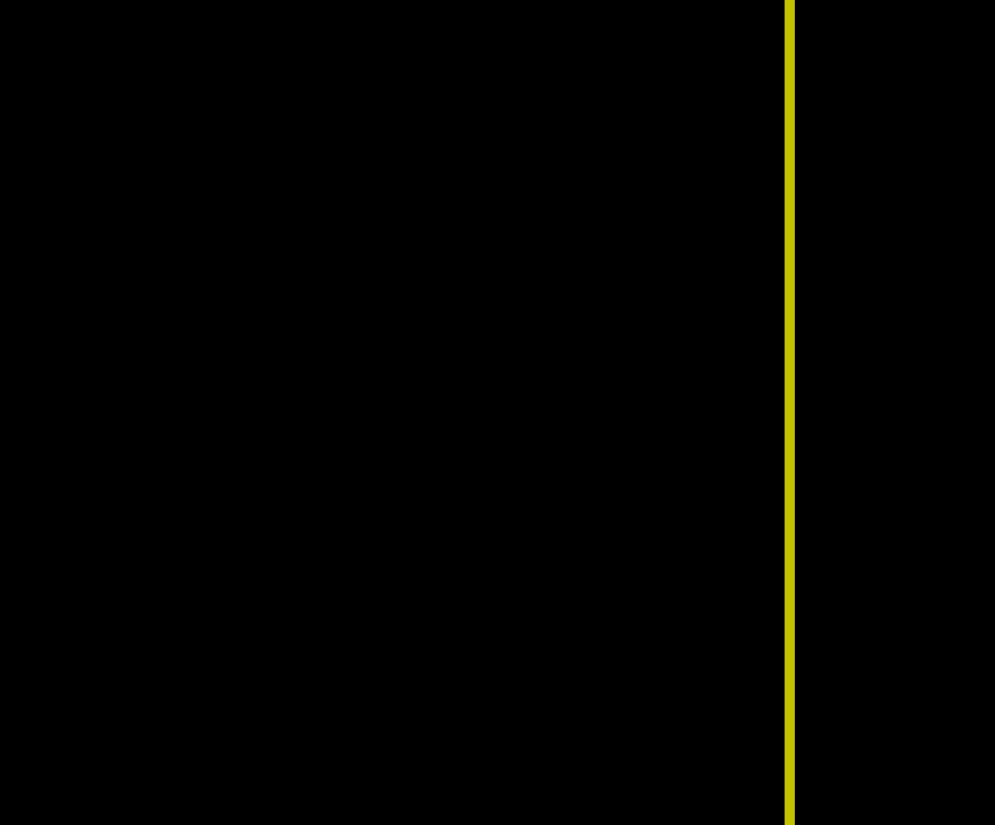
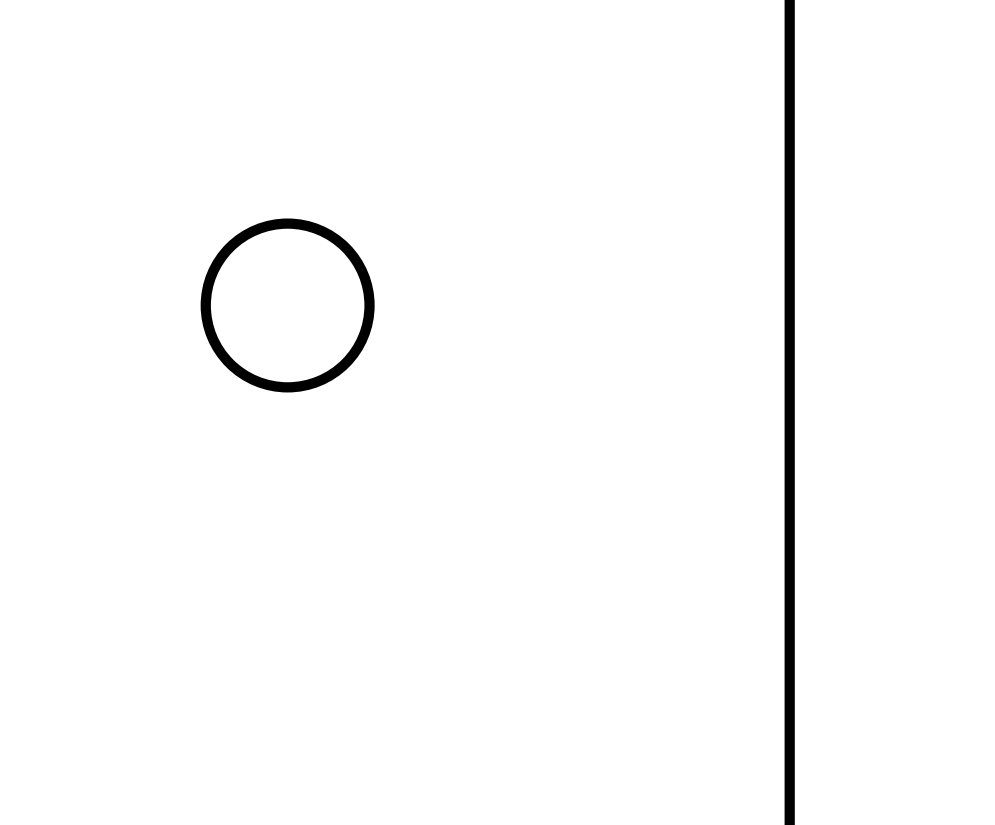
round board edge: none -> [200, 218, 375, 393]

